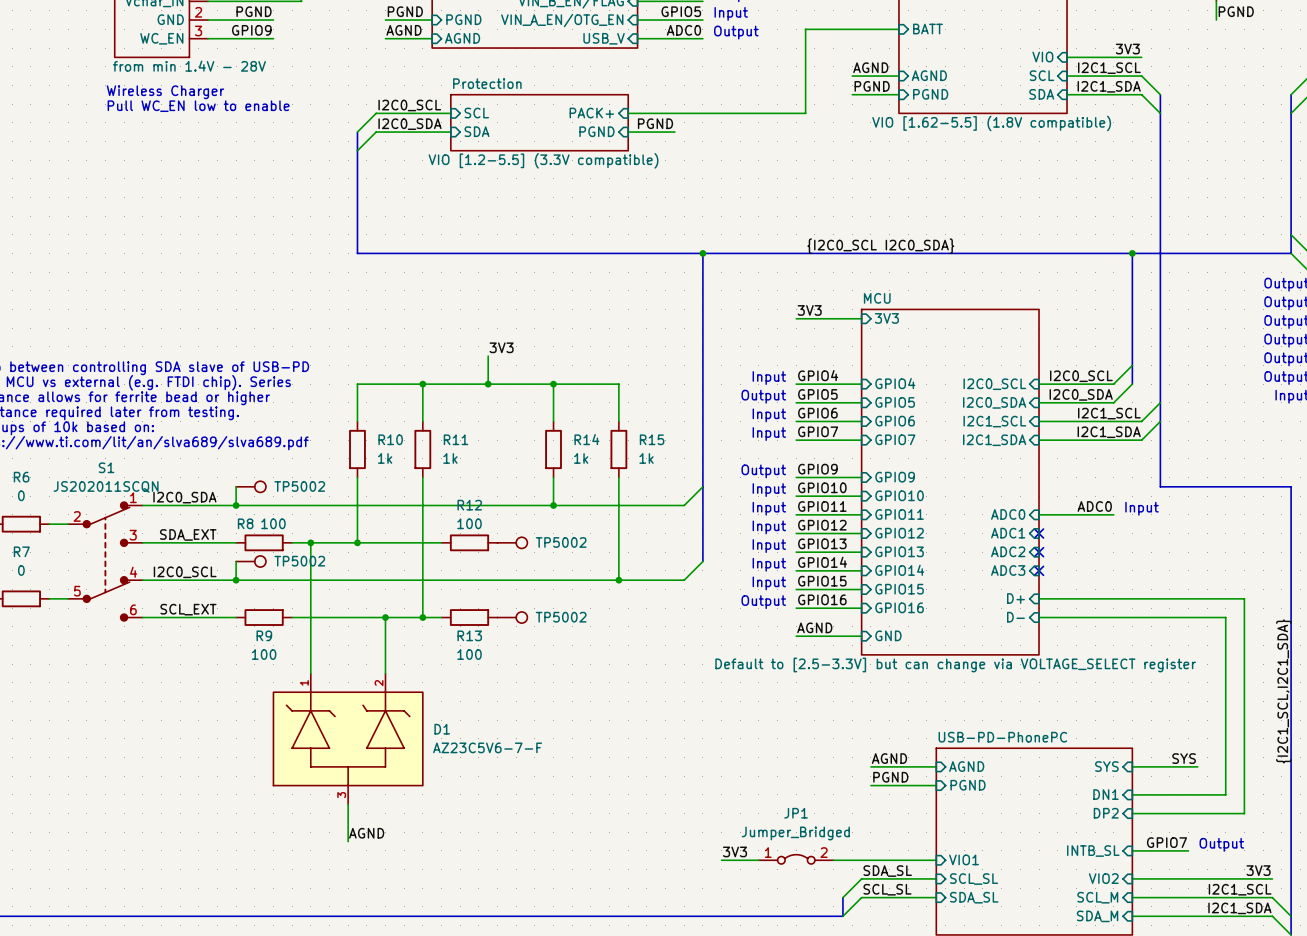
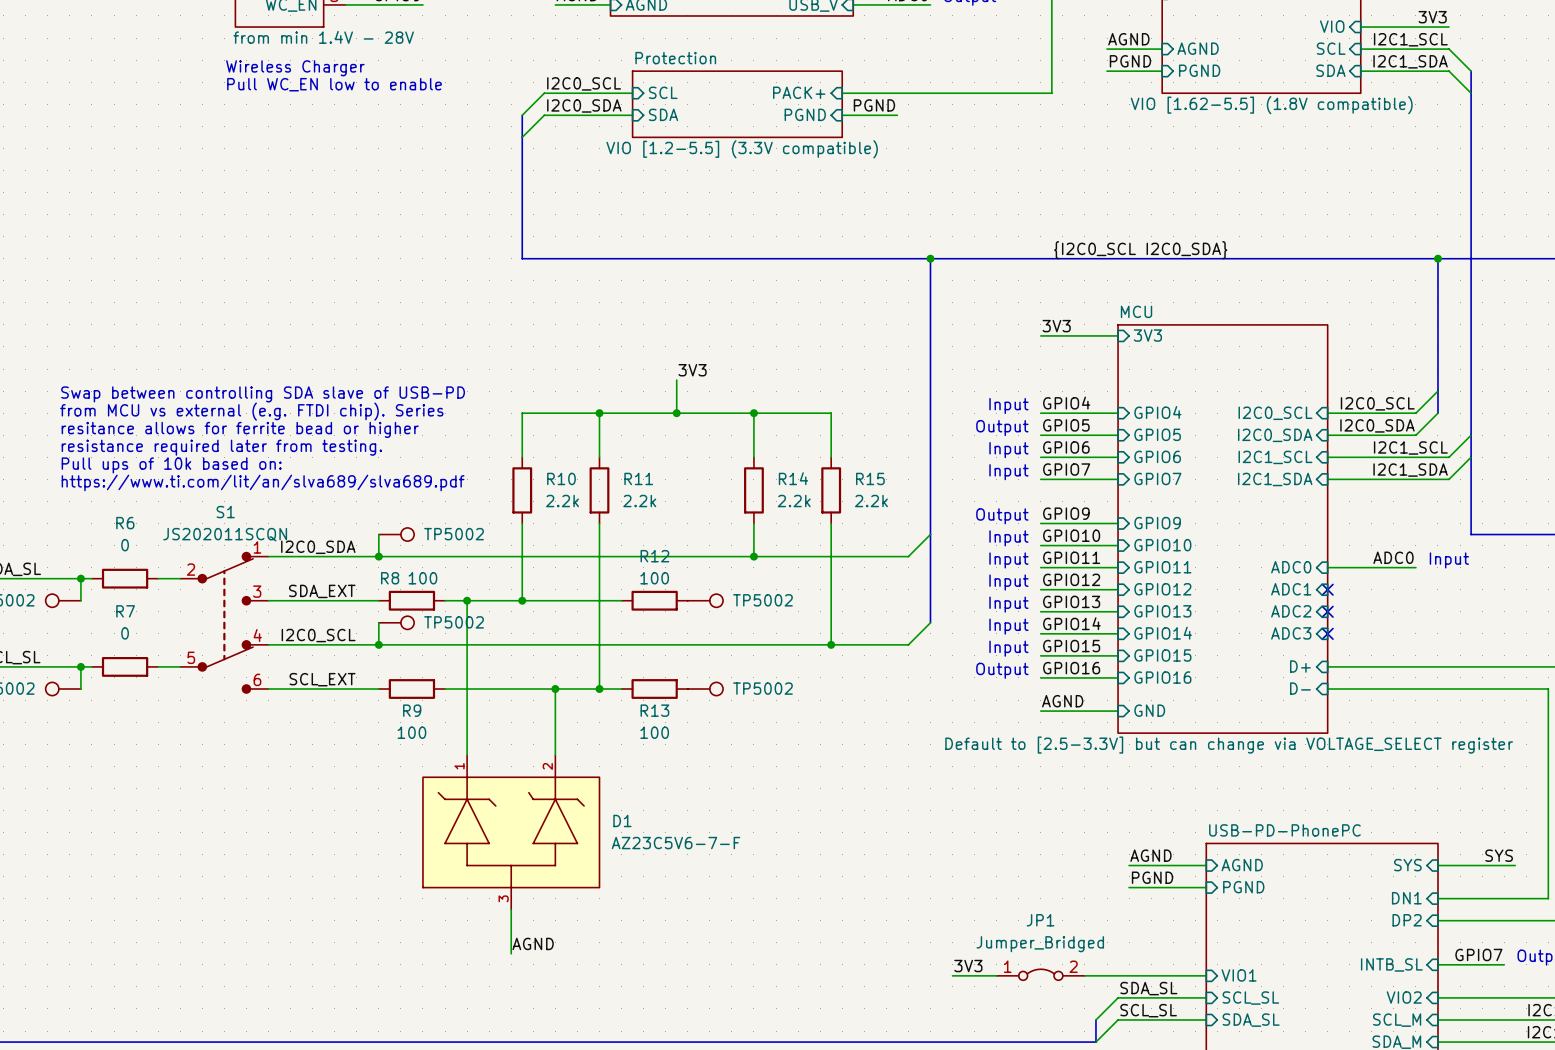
R10 value: 1k (385, 458) -> 2.2k (562, 501)
R11 value: 1k (450, 458) -> 2.2k (639, 501)
R14 value: 1k (581, 458) -> 2.2k (794, 501)
R15 value: 1k (646, 458) -> 2.2k (871, 501)

